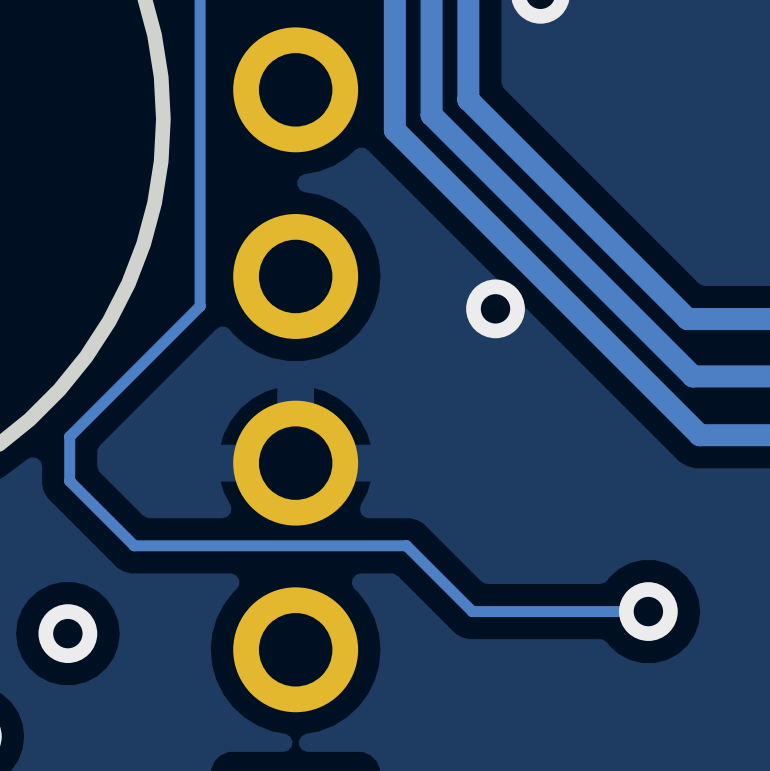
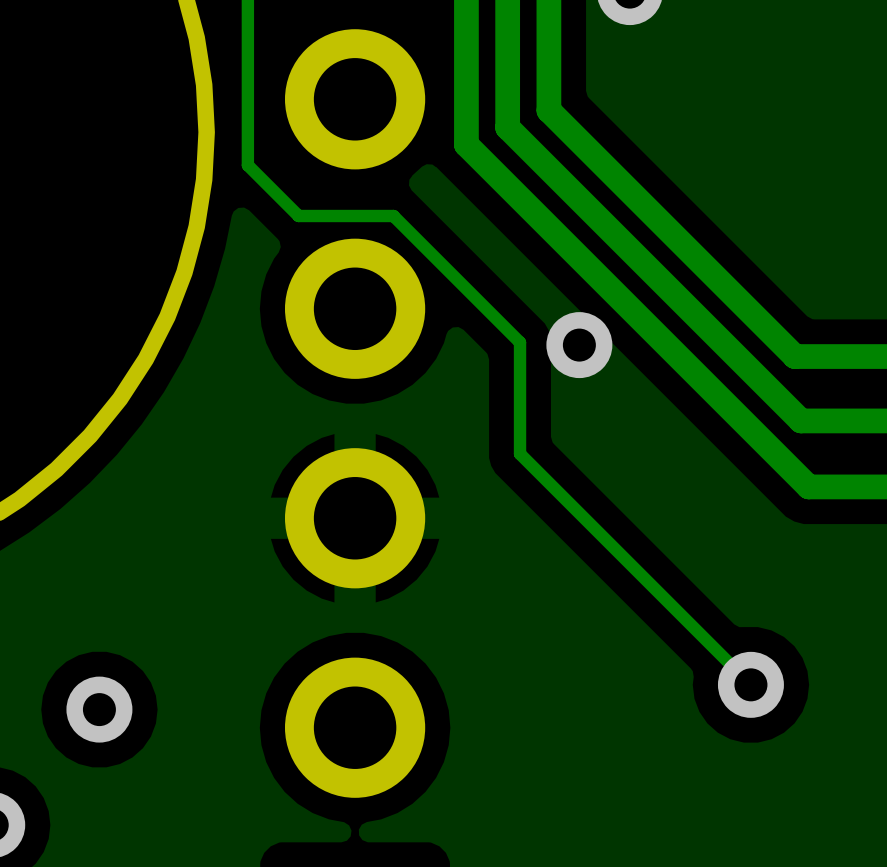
track: (200, 148) (200, 306) (69, 436) (69, 481) (134, 545) (406, 545) (472, 611) (648, 611) -> (247, 165) (298, 216) (393, 216) (520, 342) (520, 453) (750, 684)

